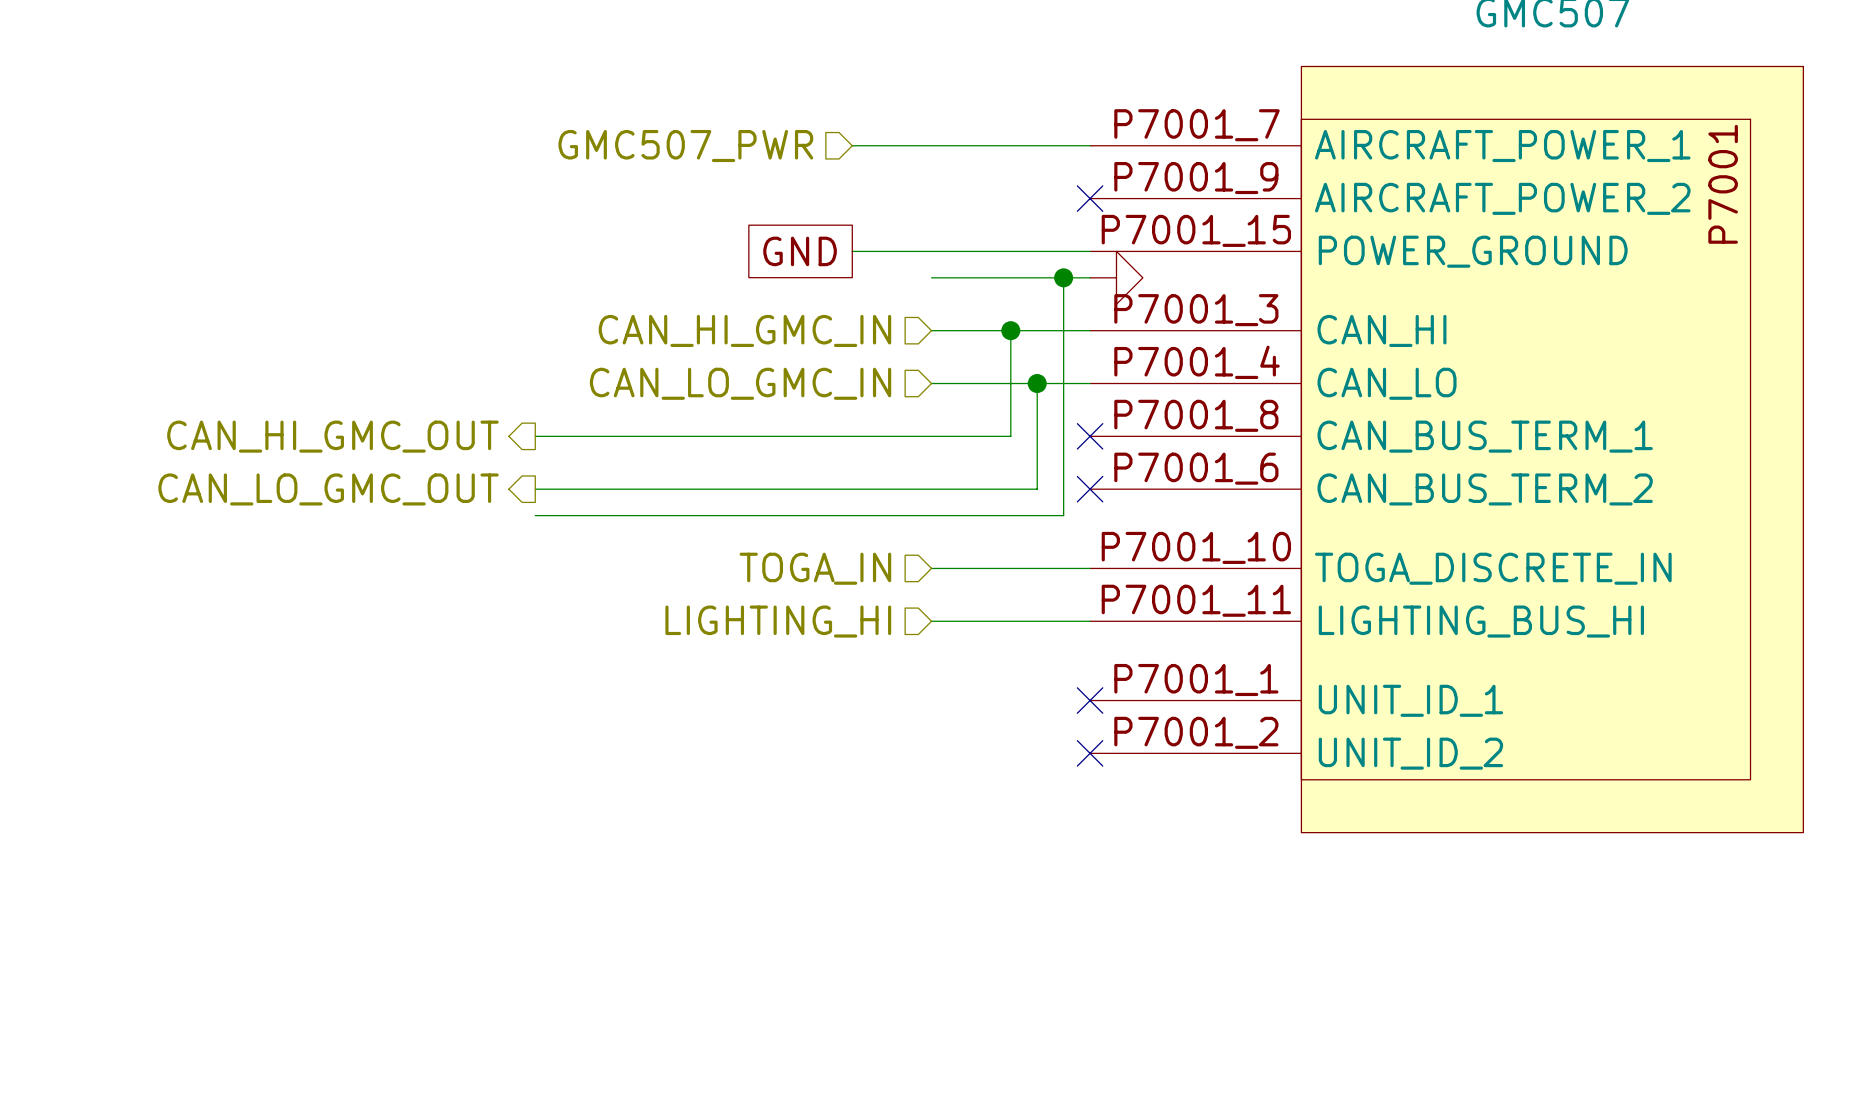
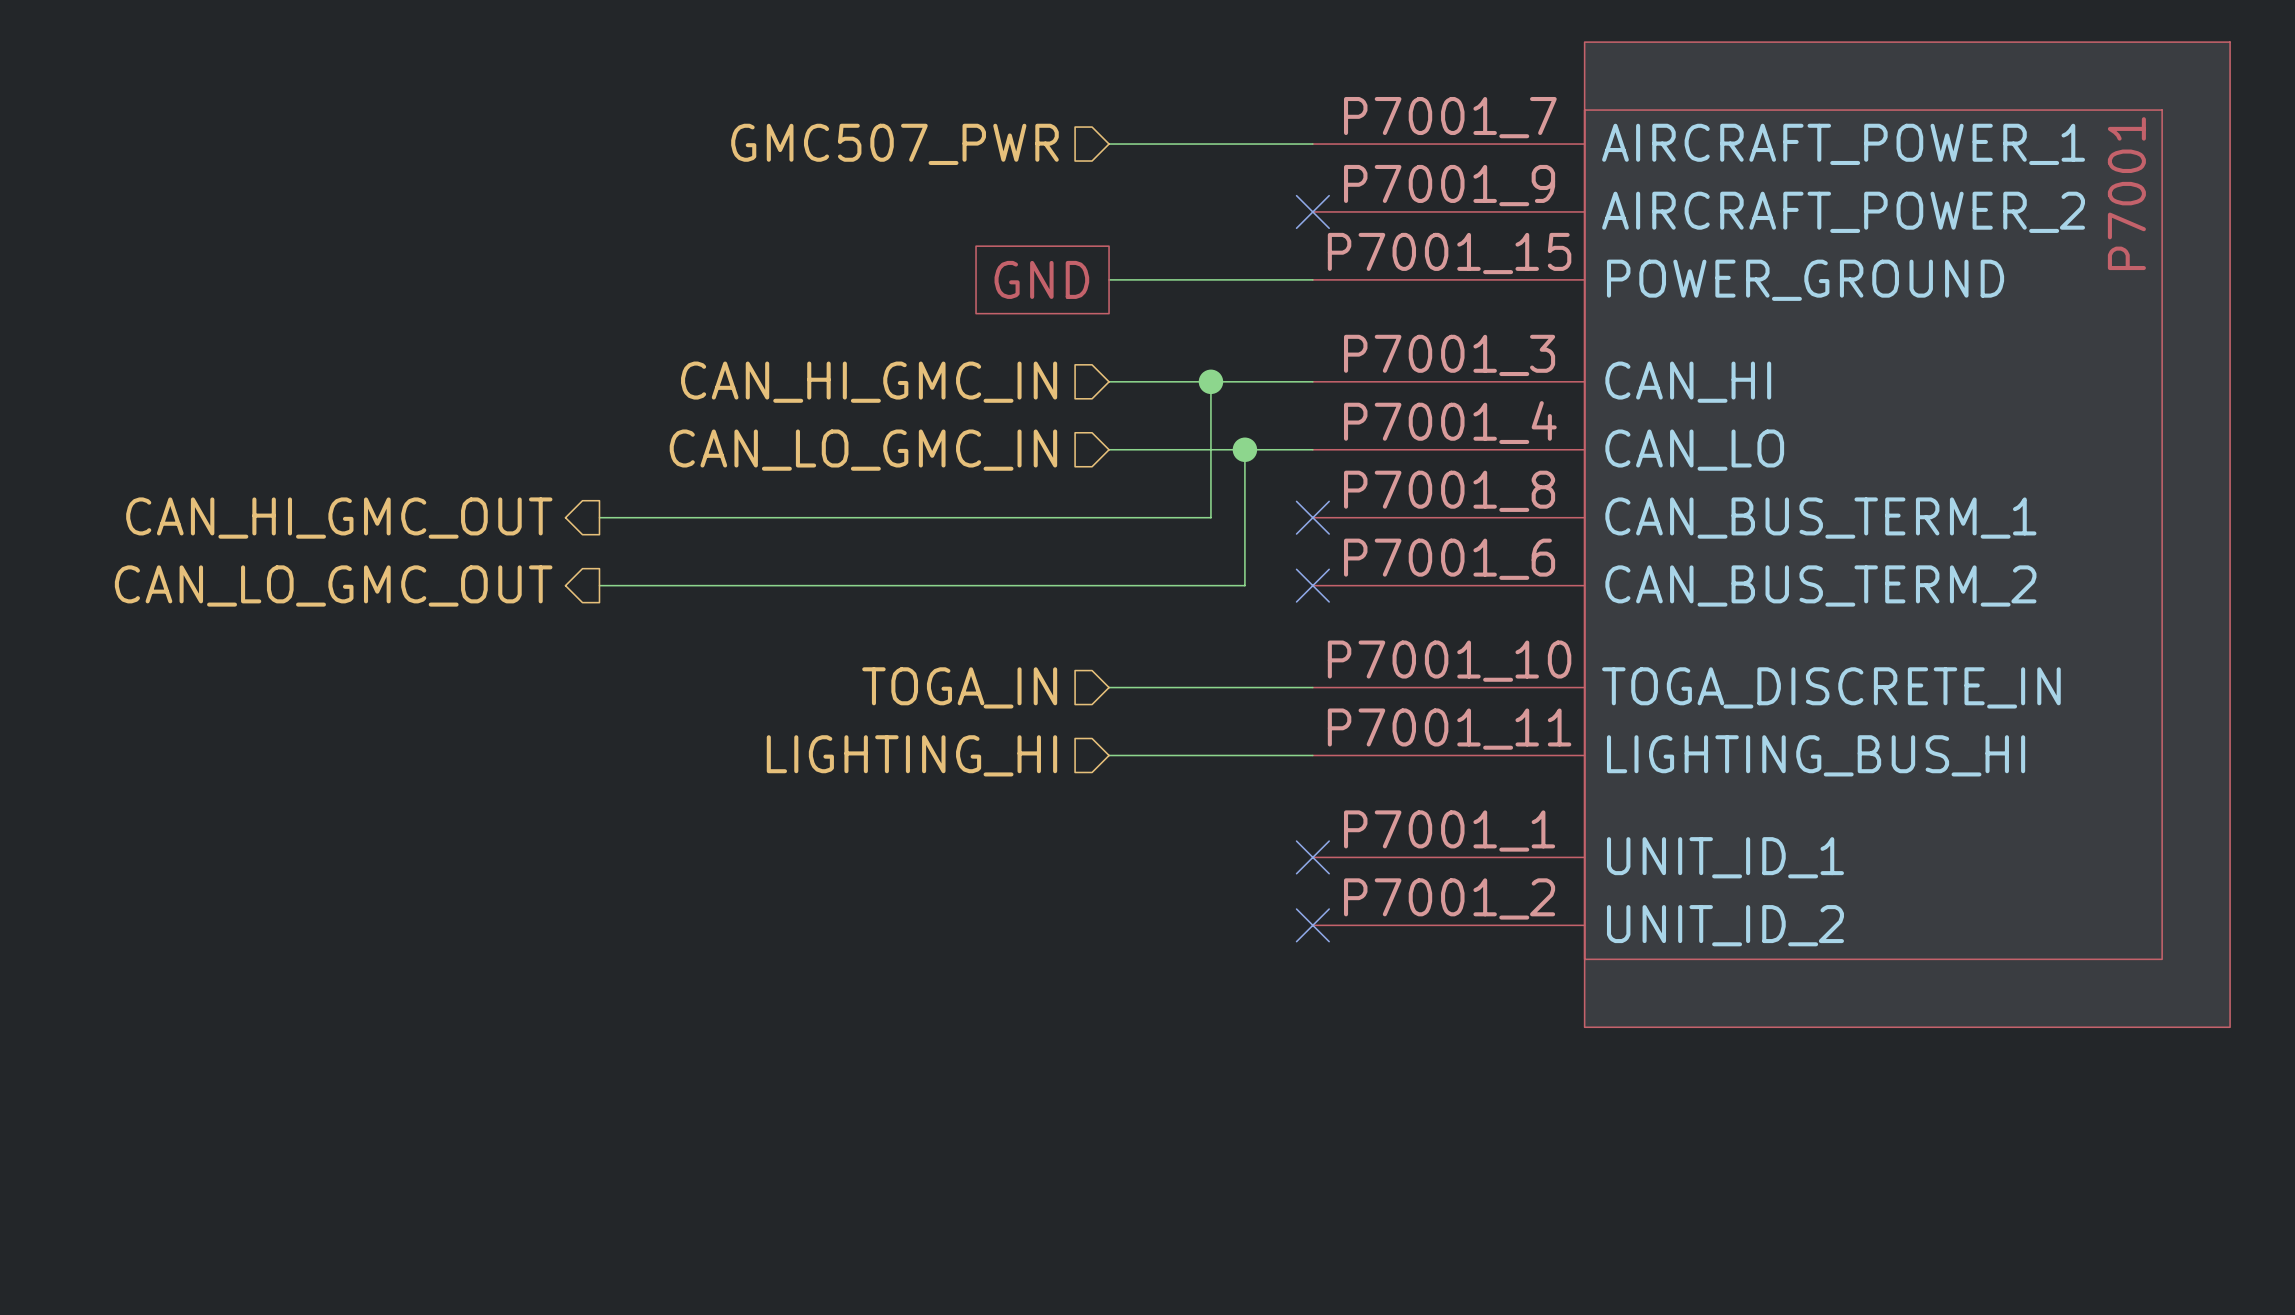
wire: (852, 145) (931, 145) -> none
hierarchical label position: GMC507_PWR (685, 146) -> GMC507_PWR (894, 144)
global label position: GND (800, 251) -> GND (1041, 279)
wire: (852, 251) (931, 251) -> none
wire: (931, 277) (1090, 277) -> none
wire: (1063, 277) (1063, 515) (535, 515) -> none
junction: (1063, 277) -> none
power symbol: (1116, 277) -> none

